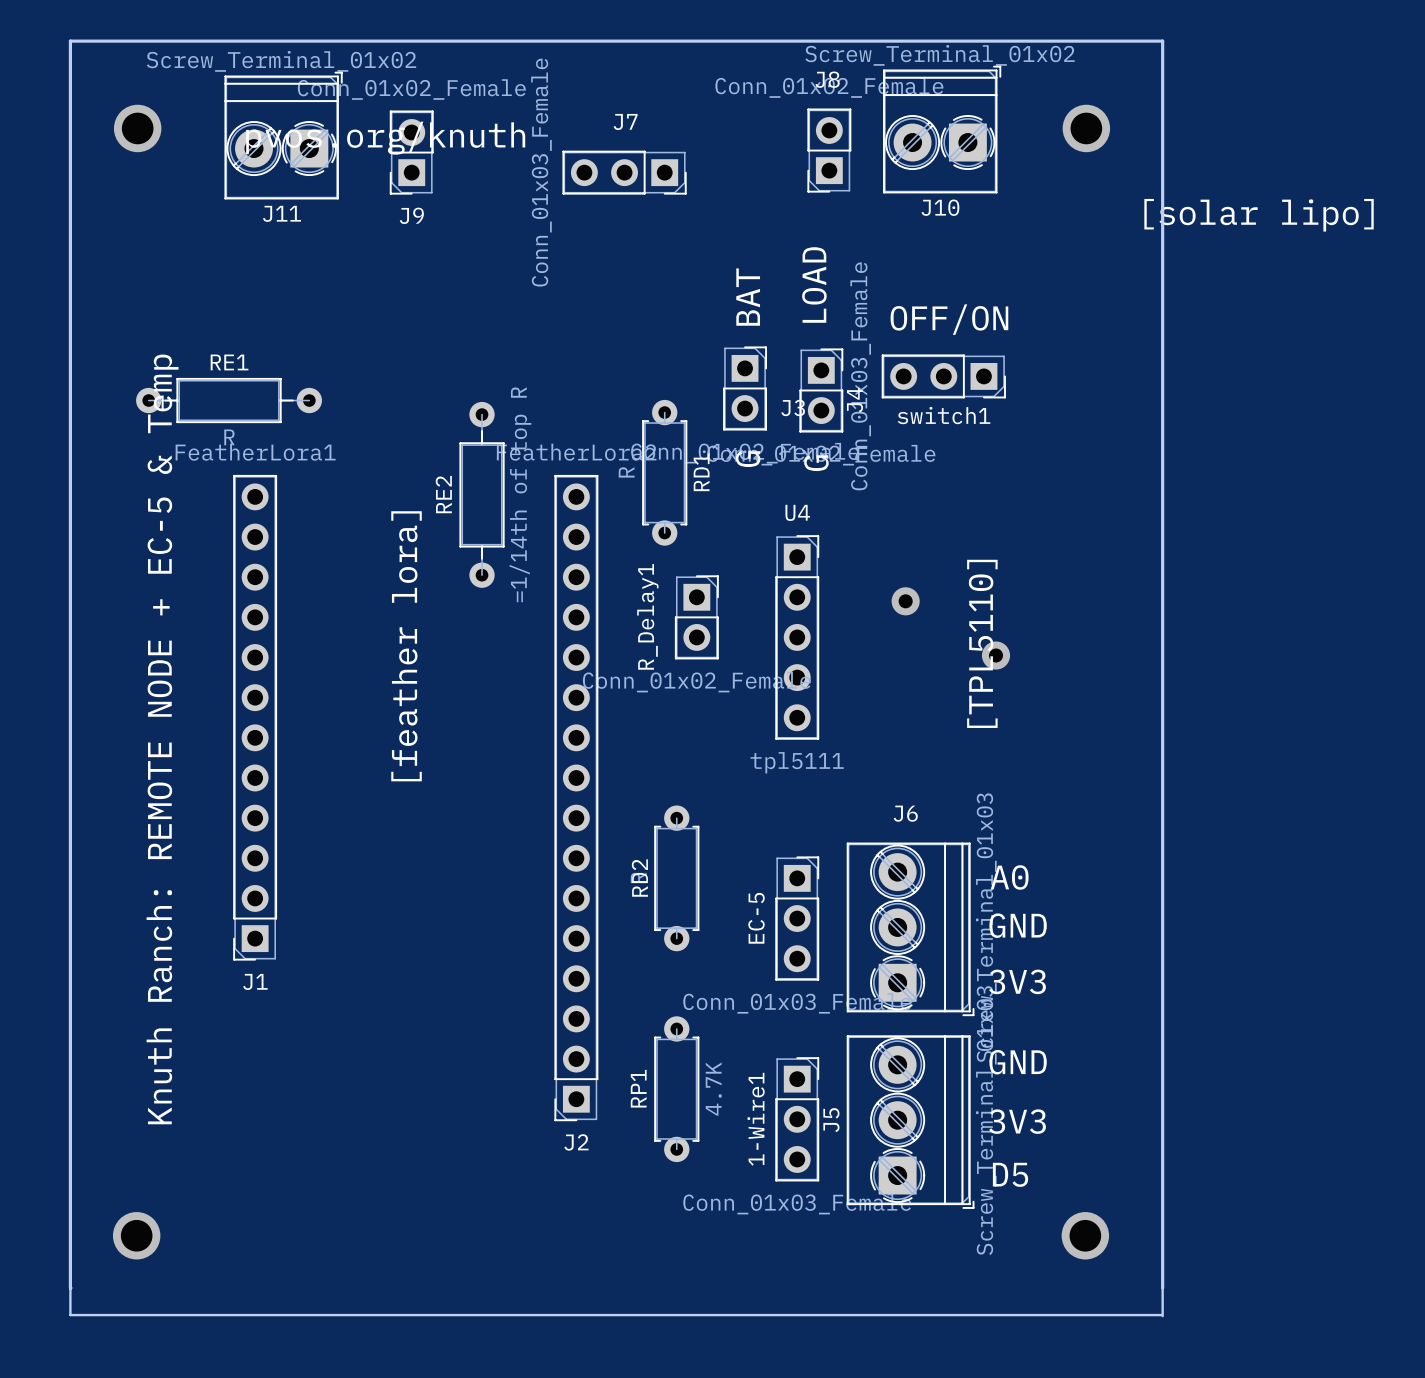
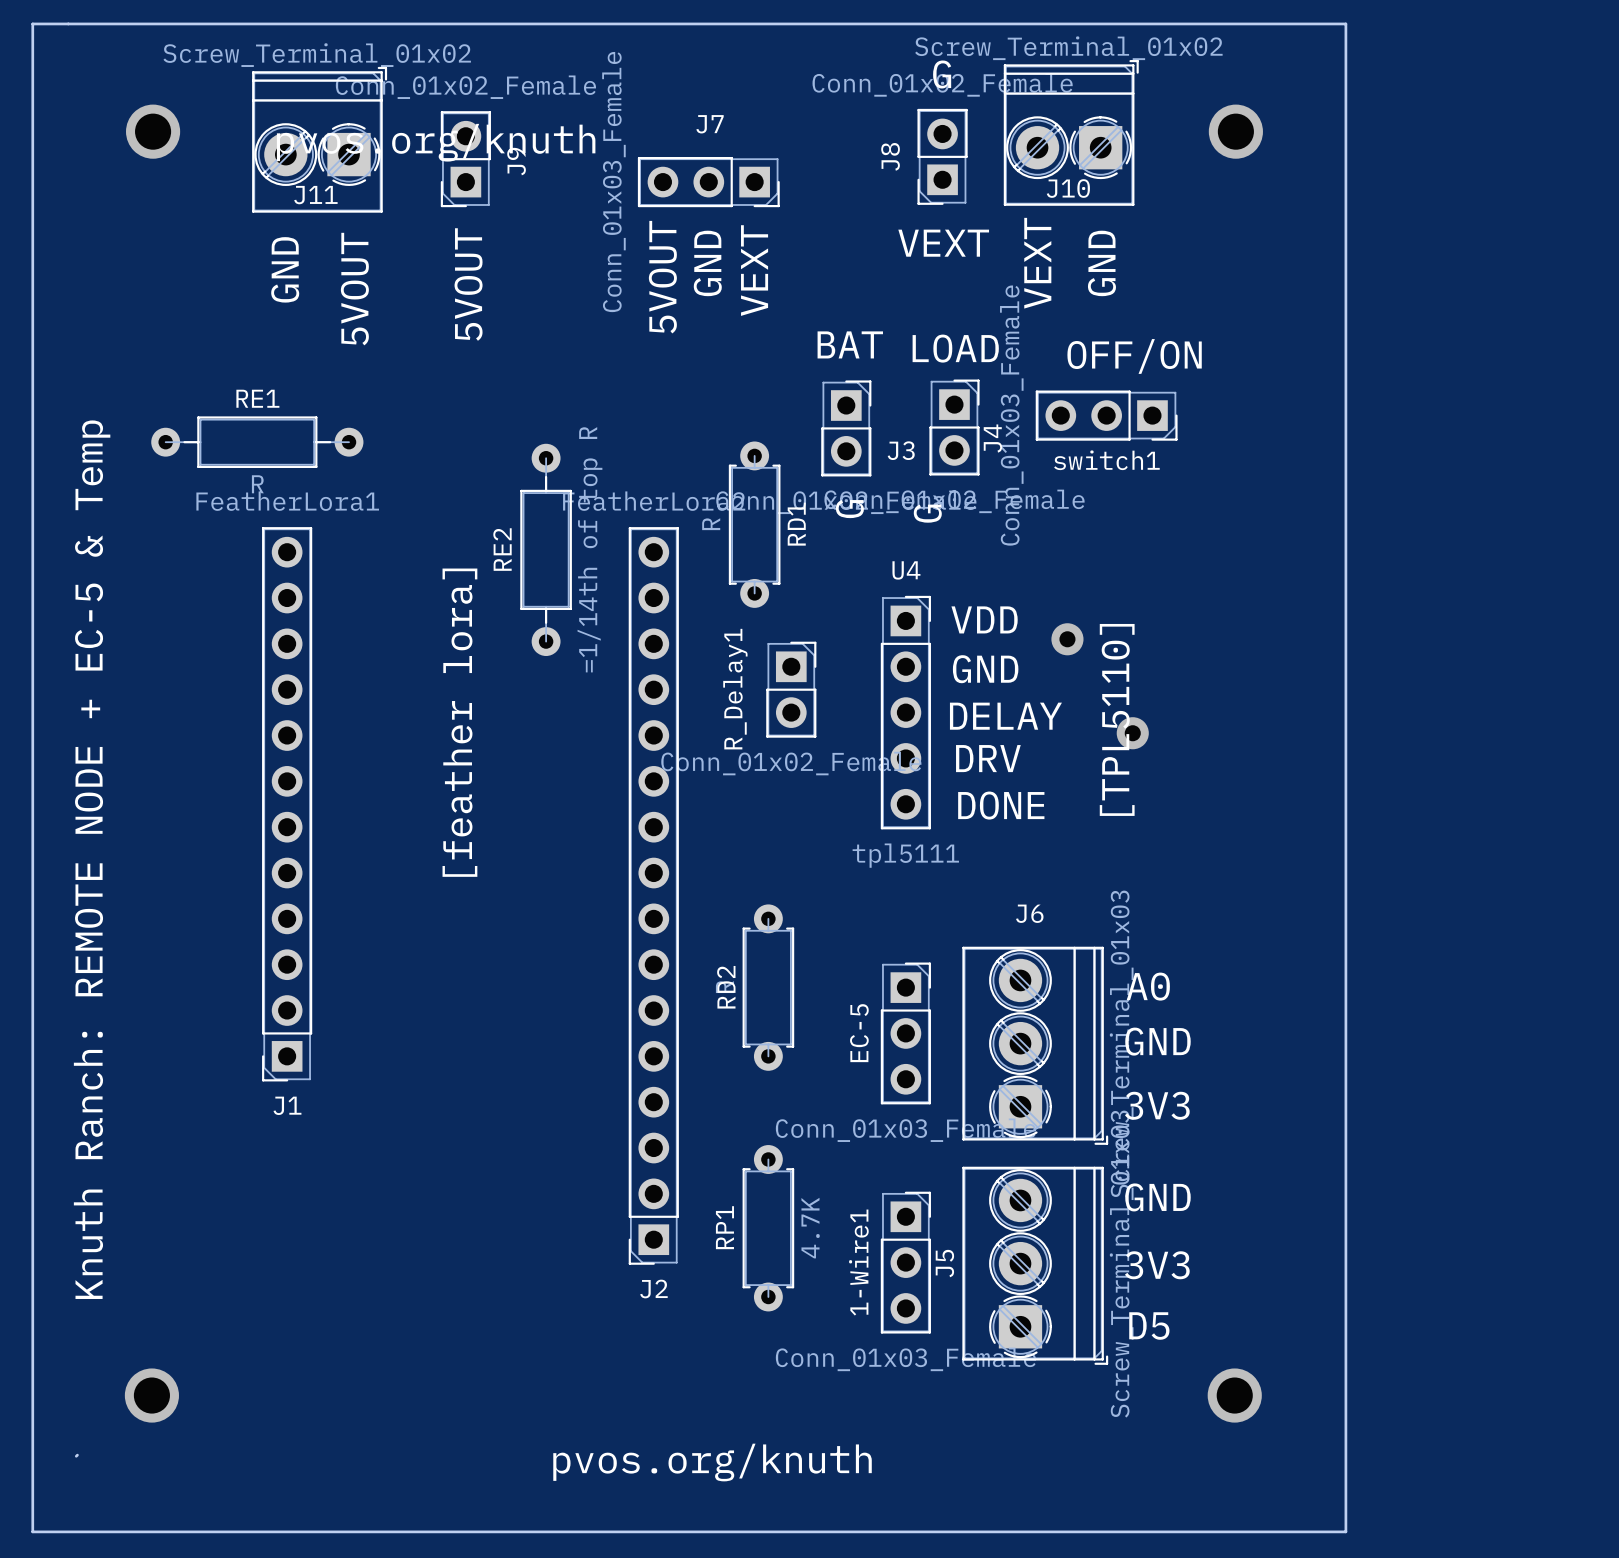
board edge: none -> (32, 23) (1345, 23) (1345, 1531) (32, 1531) (32, 23)
text: none -> G (942, 74)
J8 name rotation: 0° (827, 79) -> 90° counterclockwise (890, 156)
J8 name position: J8 (827, 79) -> J8 (890, 156)
J10 name position: J10 (940, 207) -> J10 (1068, 188)
J11 name position: J11 (281, 213) -> J11 (315, 195)
J9 name rotation: 0° (411, 215) -> 90° counterclockwise (516, 161)
J9 name position: J9 (411, 215) -> J9 (516, 161)
text: [solar lipo] (1259, 215) -> none
text: none -> VEXT (943, 243)
text: none -> GND (707, 263)
text: none -> VEXT (1037, 263)
text: none -> GND (1101, 263)
text: none -> GND (285, 269)
text: none -> VEXT (754, 270)
text: none -> 5VOUT (662, 277)
text: none -> 5VOUT (468, 284)
text: none -> 5VOUT (354, 289)
text rotation: 0° (814, 284) -> 90° clockwise (955, 348)
text rotation: 0° (748, 297) -> 90° clockwise (850, 344)
text position: OFF/ON (949, 319) -> OFF/ON (1134, 356)
switch1 position: (943, 376) -> (1106, 415)
J4 position: (821, 390) -> (954, 427)
text: none -> VDD (984, 619)
text: none -> GND (985, 669)
via position: (905, 601) -> (1067, 639)
text: none -> DELAY (1005, 716)
text: none -> DRV (988, 758)
text: none -> DONE (1001, 805)
text position: Knuth Ranch: REMOTE NODE + EC-5 & Temp (162, 739) -> Knuth Ranch: REMOTE NODE + EC-5 & Temp (92, 859)
text: none -> pvos.org/knuth (712, 1462)
board edge: (1161, 1315) (70, 1315) (70, 41) (1162, 41) (1162, 1316) -> none

